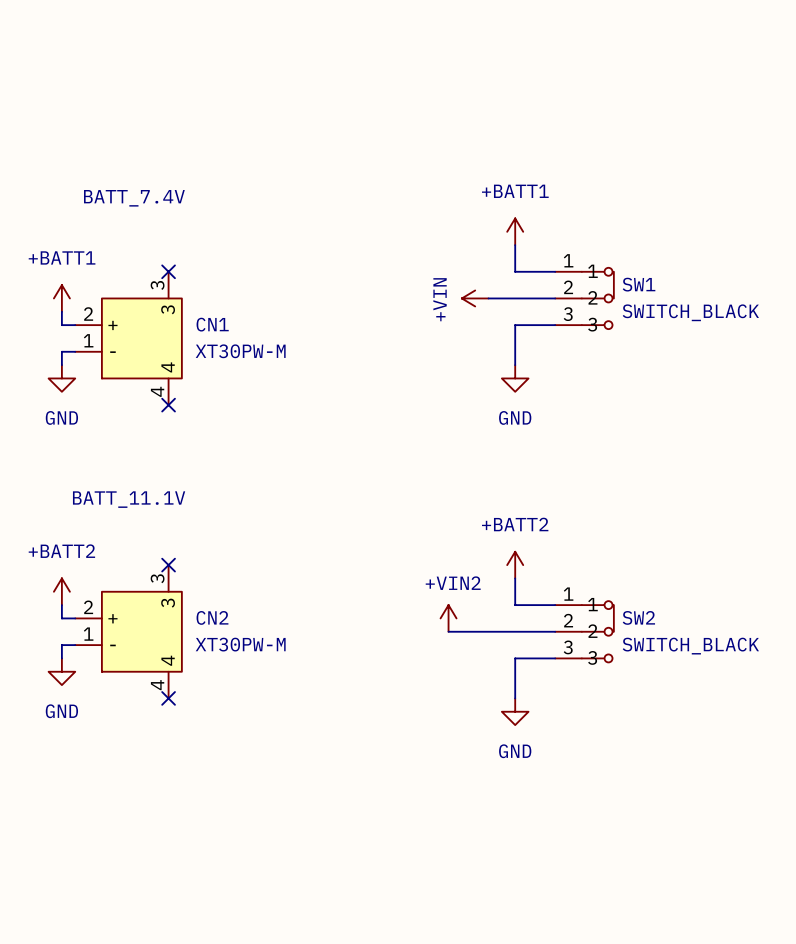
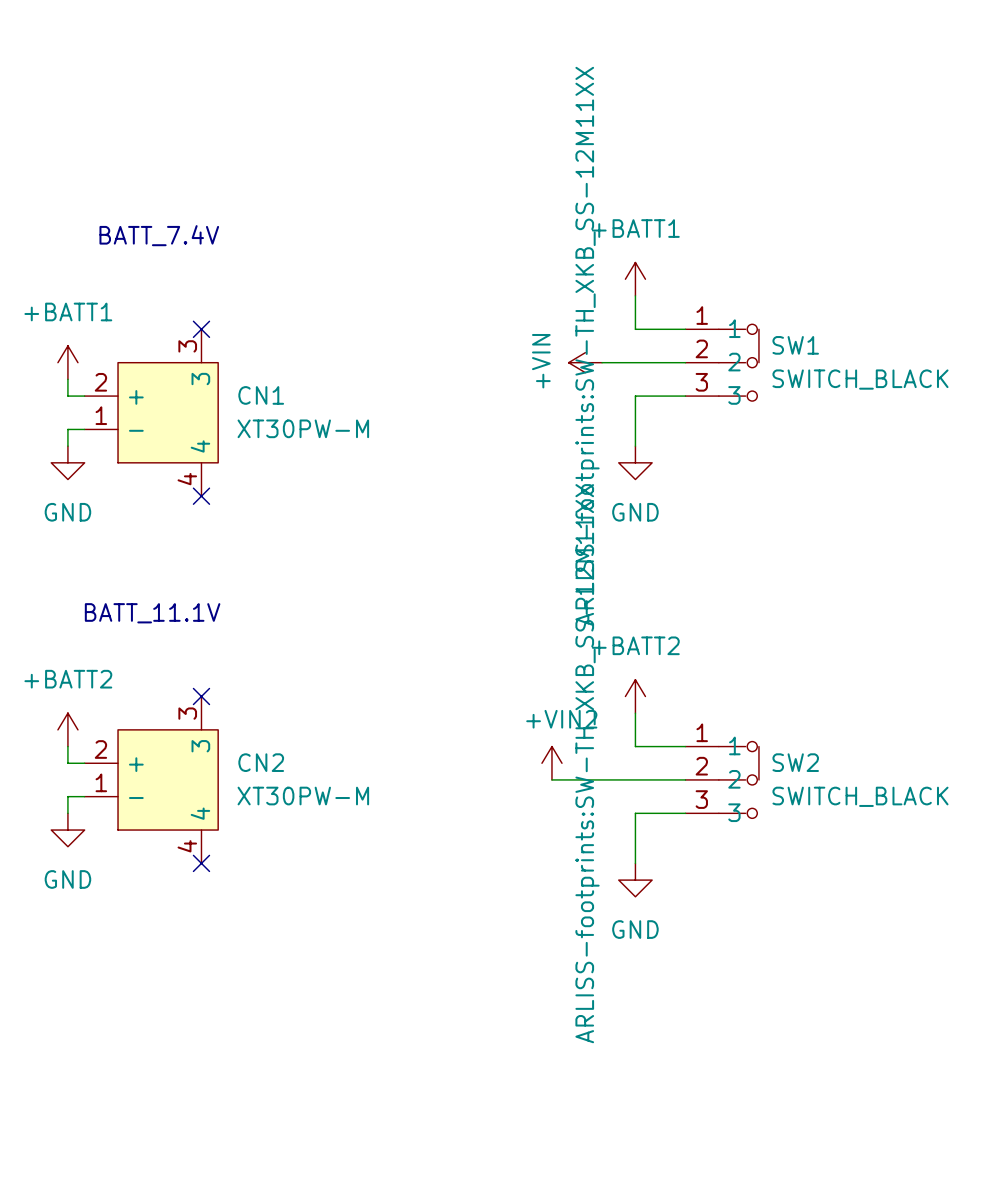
SW1 text: none -> ARLISS-footprints:SW-TH_XKB_SS-12M11XX (587, 346)
SW2 text: none -> ARLISS-footprints:SW-TH_XKB_SS-12M11XX (587, 763)

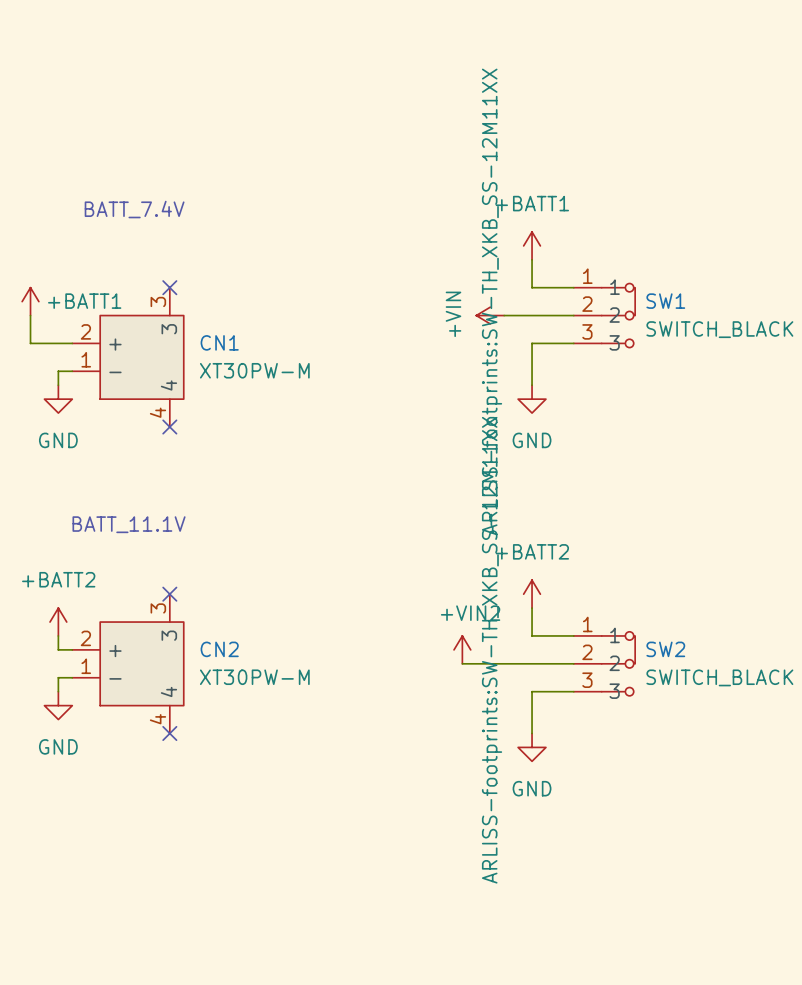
power symbol text position: +BATT1 (68, 311) -> +BATT1 (84, 301)
power symbol position: +BATT1 (67, 362) -> +BATT1 (30, 301)
wire: (67, 379) (67, 396) -> (30, 315) (30, 343) (58, 343)

